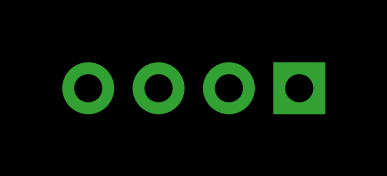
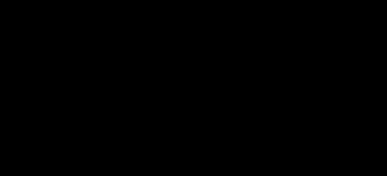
part: (193, 88) -> none

